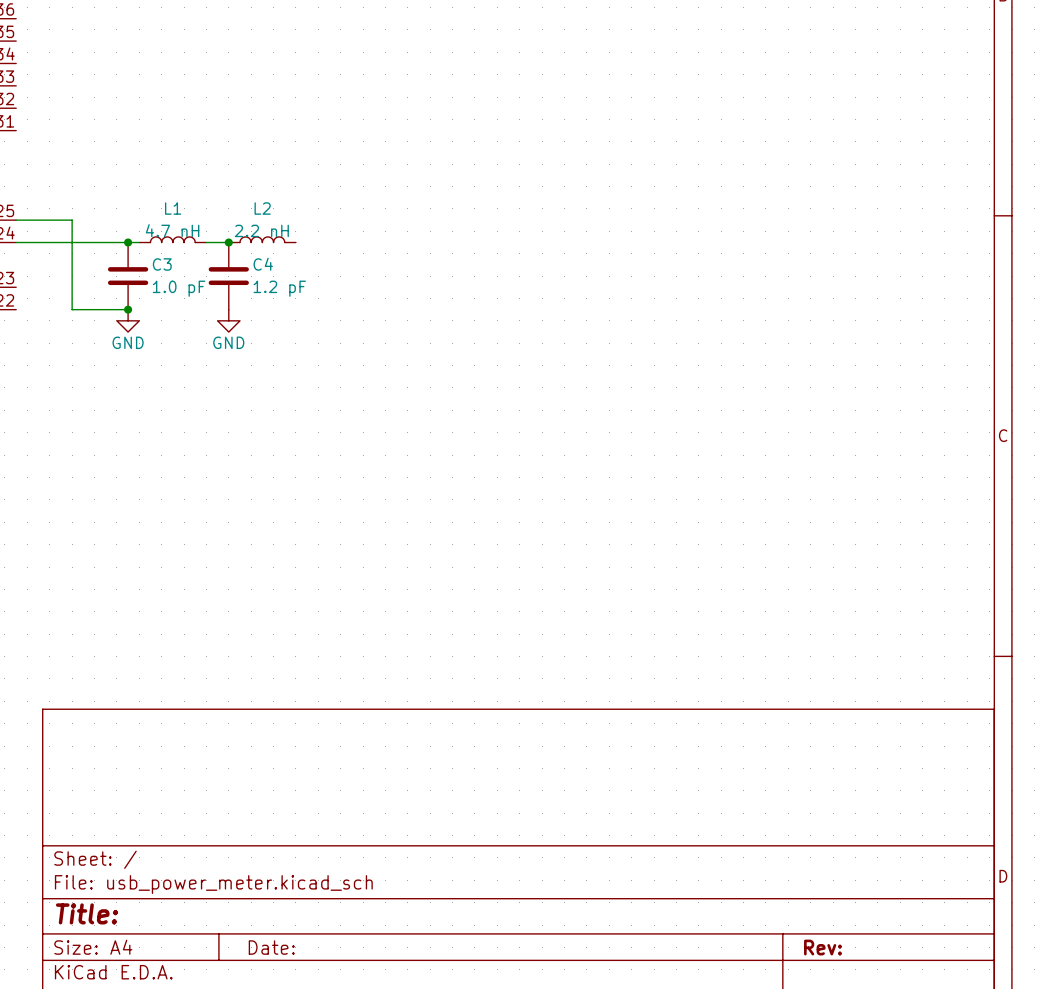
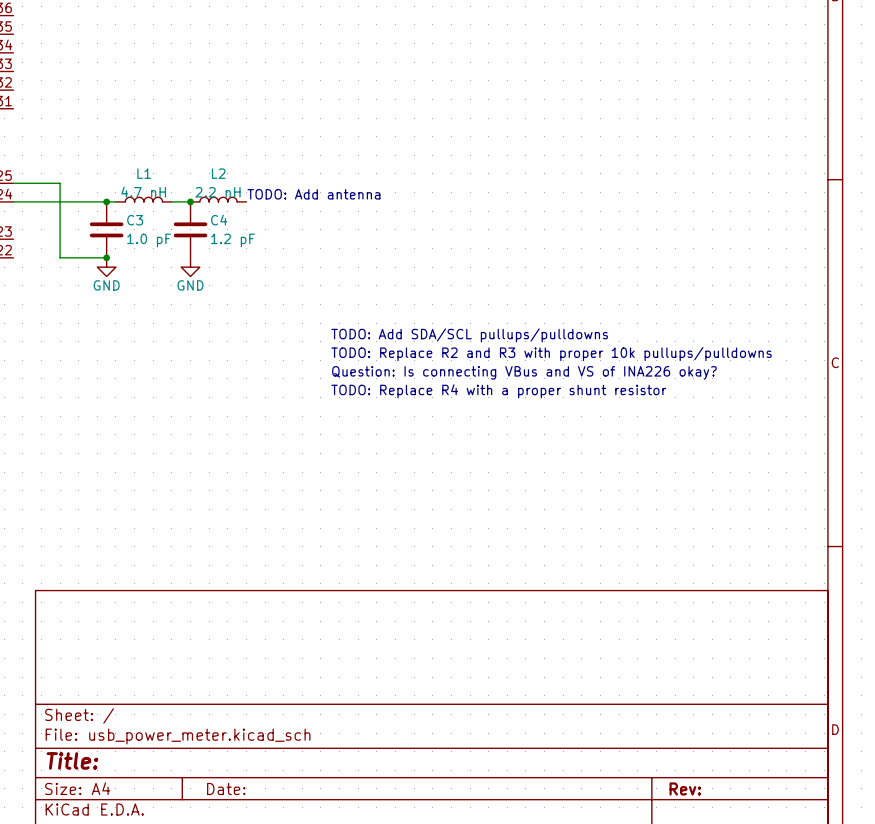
text: none -> TODO: Add antenna (313, 194)
text: none -> TODO: Add SDA/SCL pullups/pulldowns (469, 335)
text: none -> TODO: Replace R2 and R3 with proper 10k pullups/pulldowns (551, 354)
text: none -> Question: Is connecting VBus and VS of INA226 okay? (524, 372)
text: none -> TODO: Replace R4 with a proper shunt resistor (498, 391)

